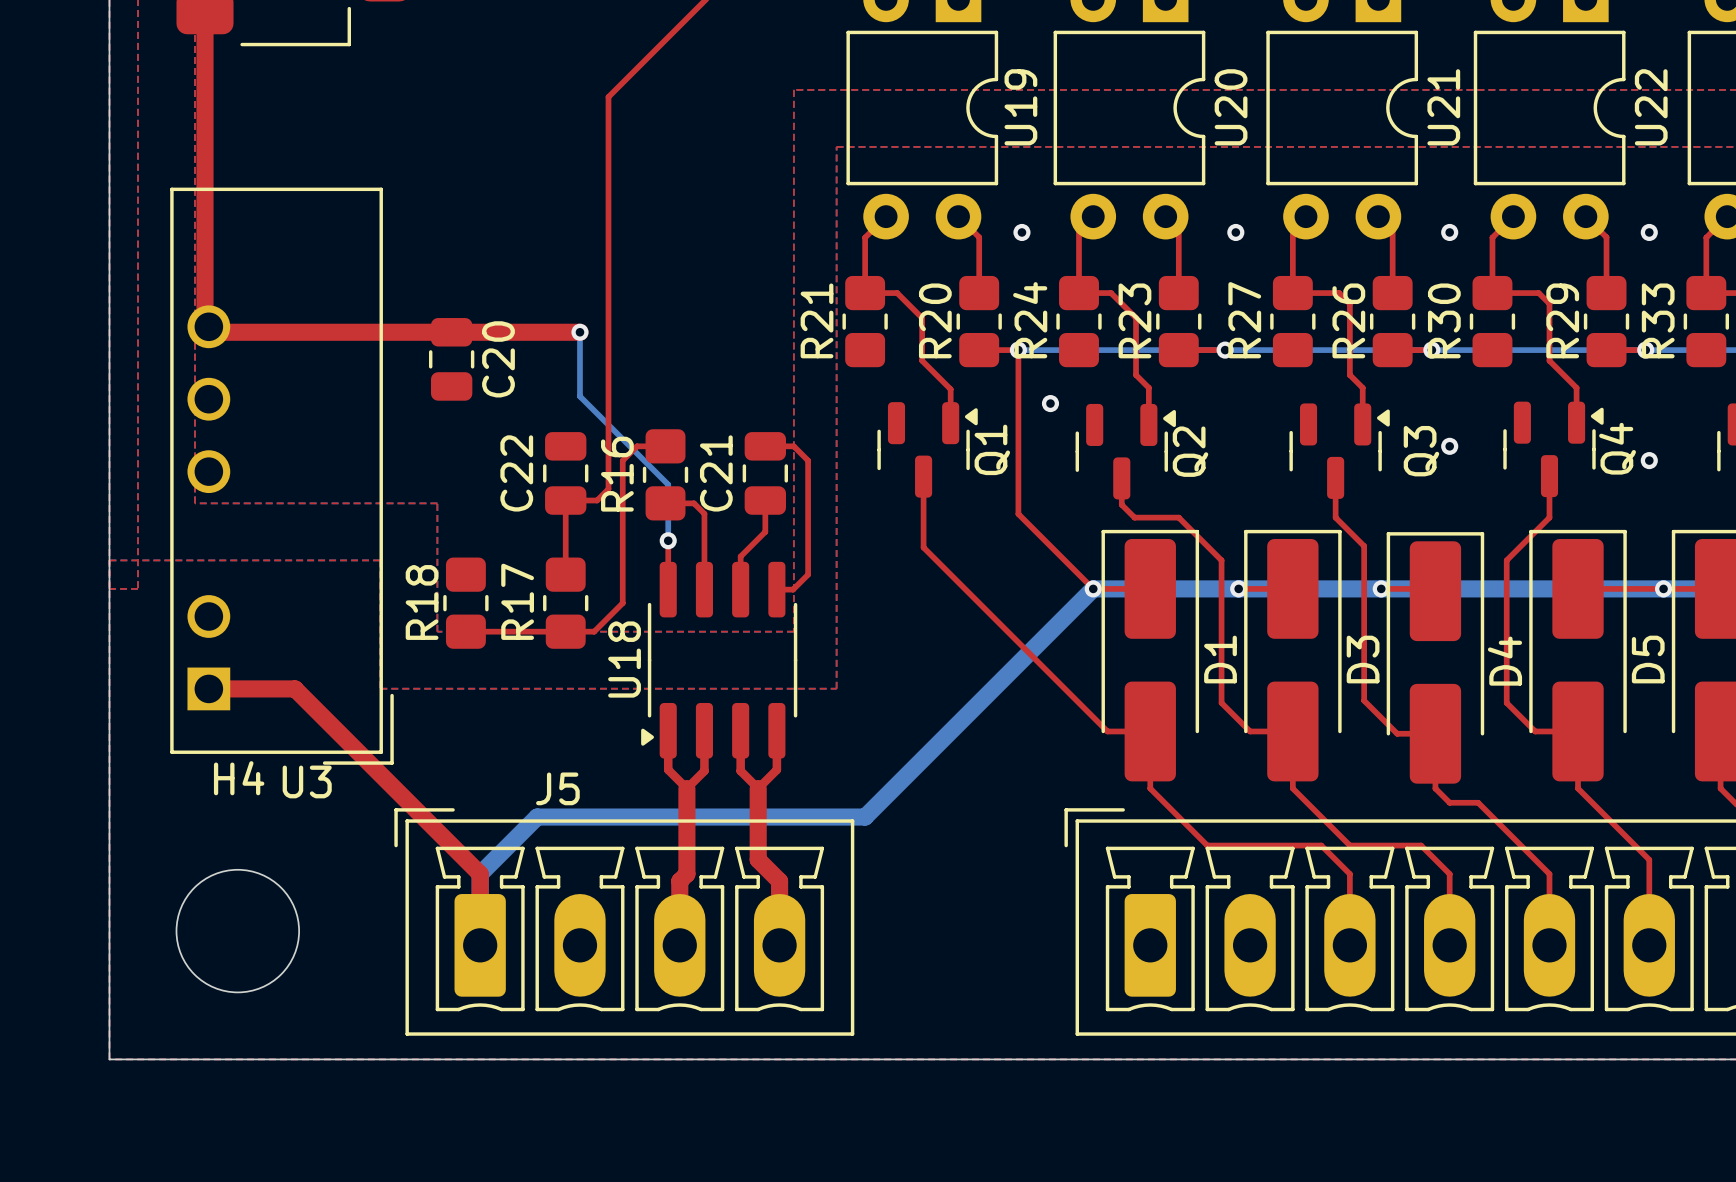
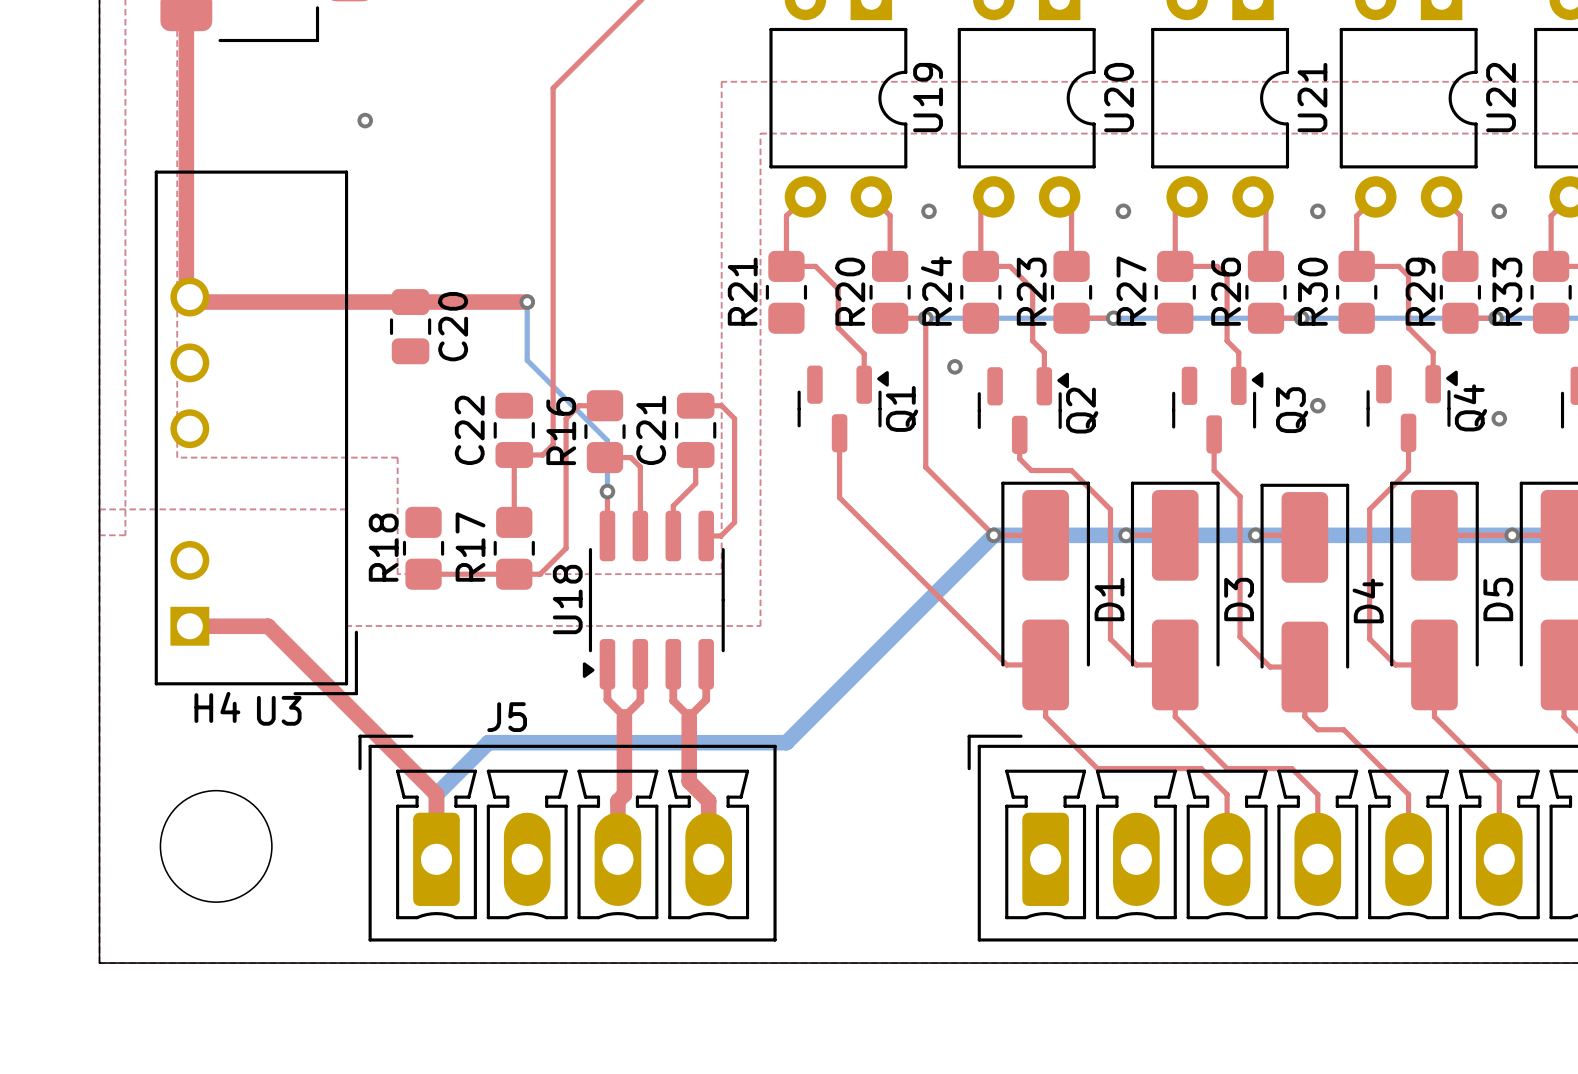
via: none -> (365, 120)

